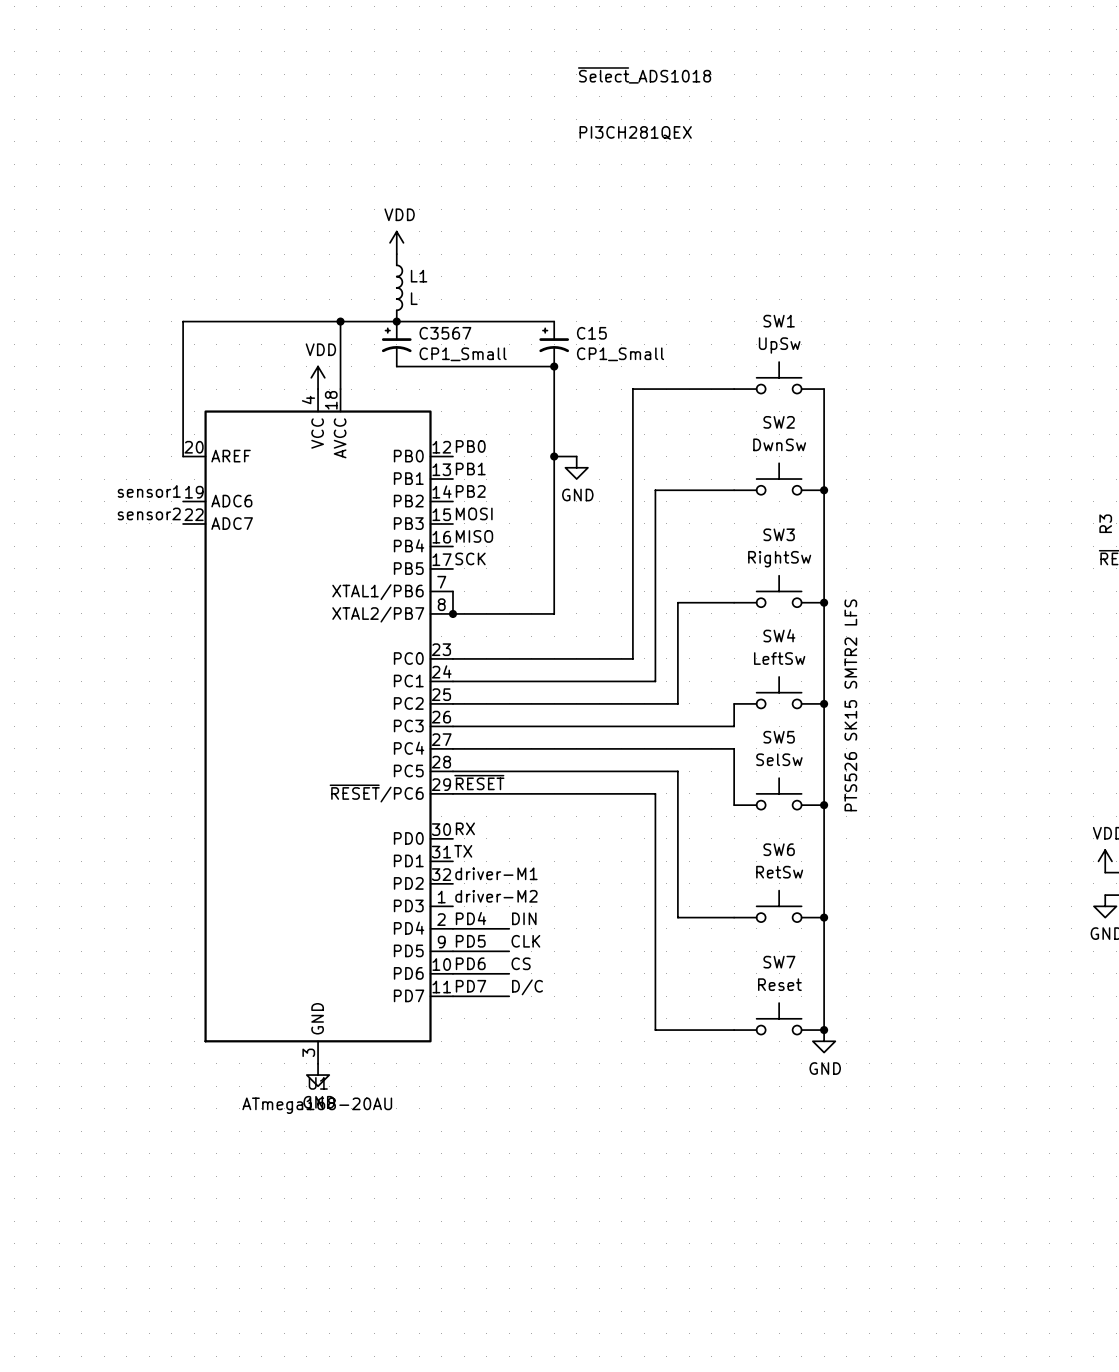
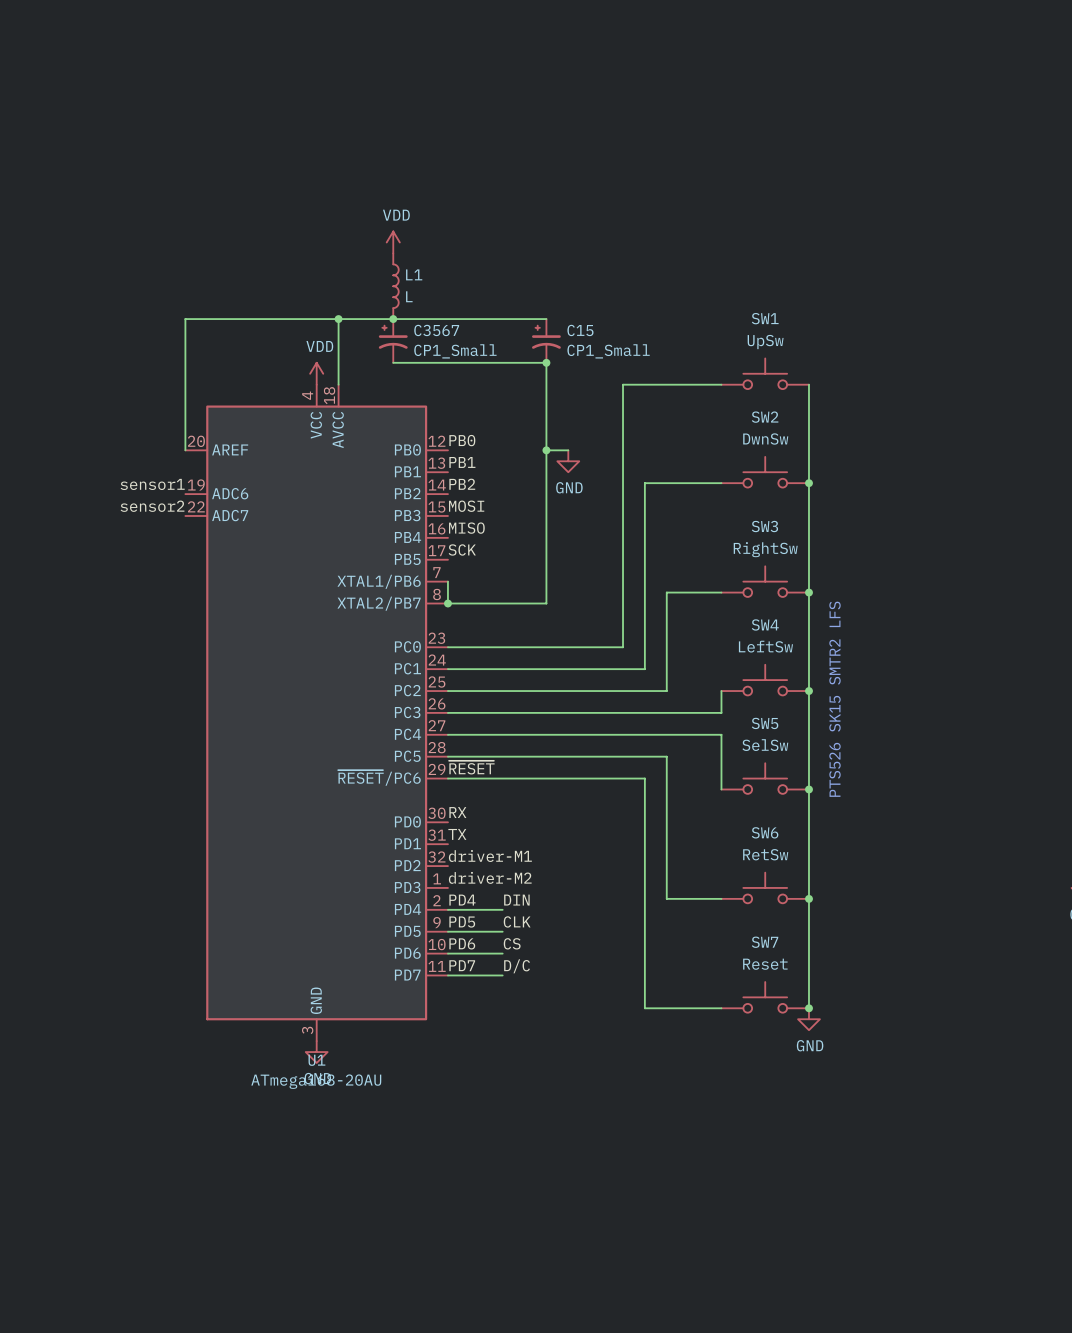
text: ~{Select}_ADS1018 (644, 75) -> none
text: PI3CH281QEX (635, 132) -> none

